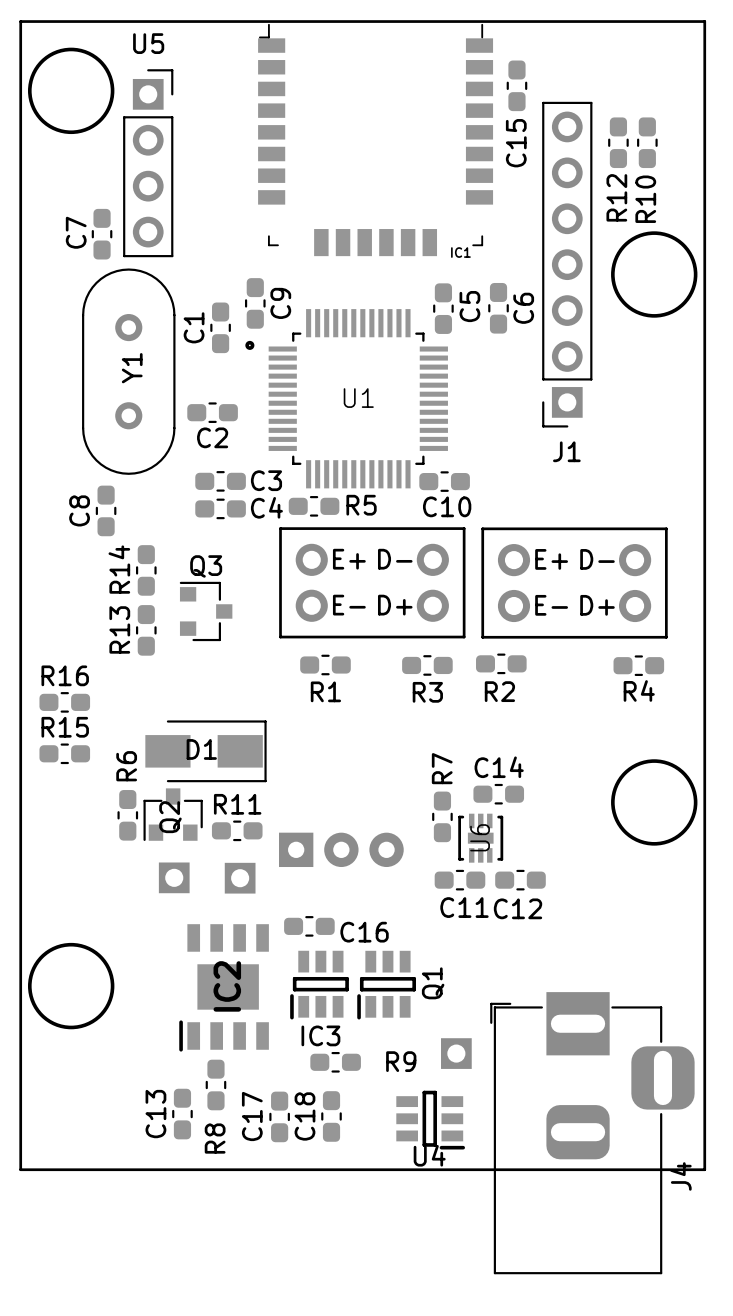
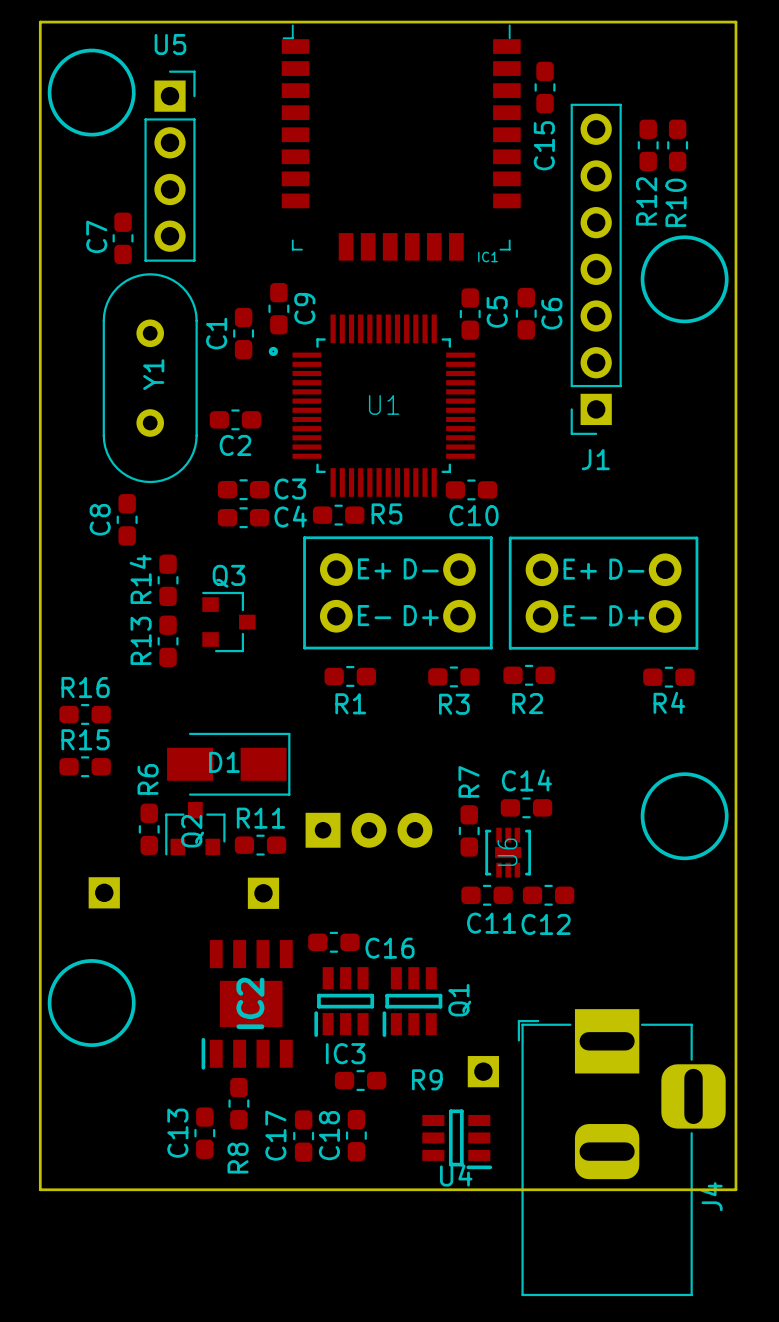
part position: (341, 849) -> (369, 830)
part position: (174, 877) -> (104, 892)

